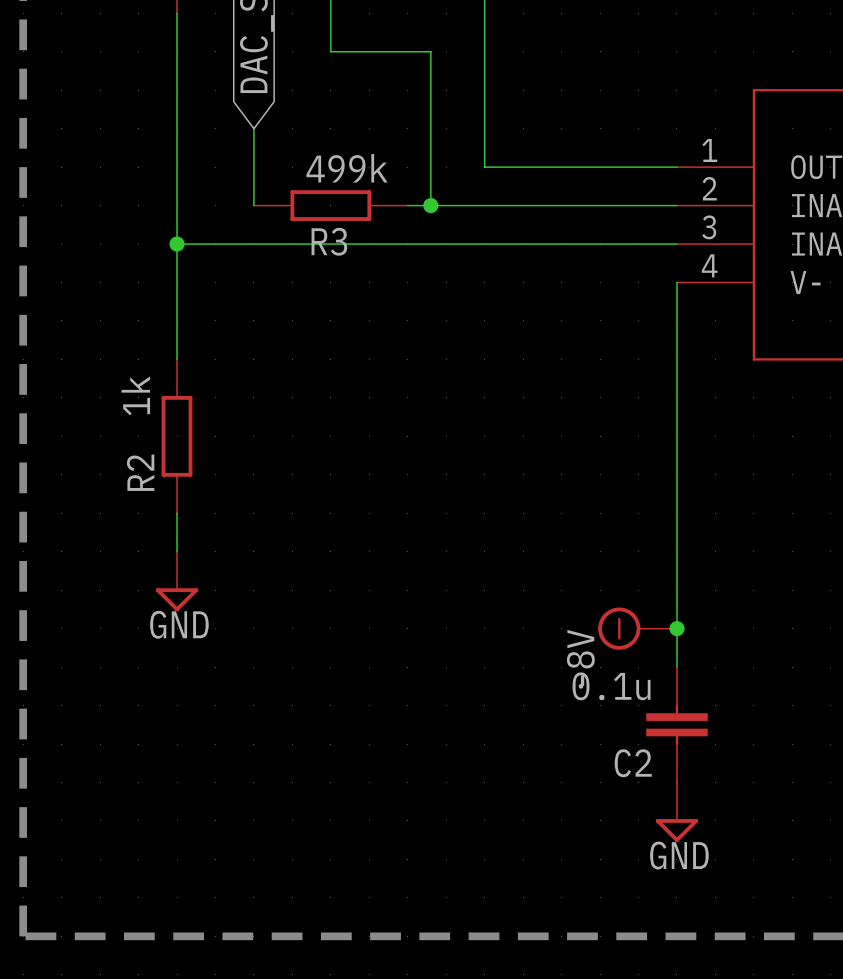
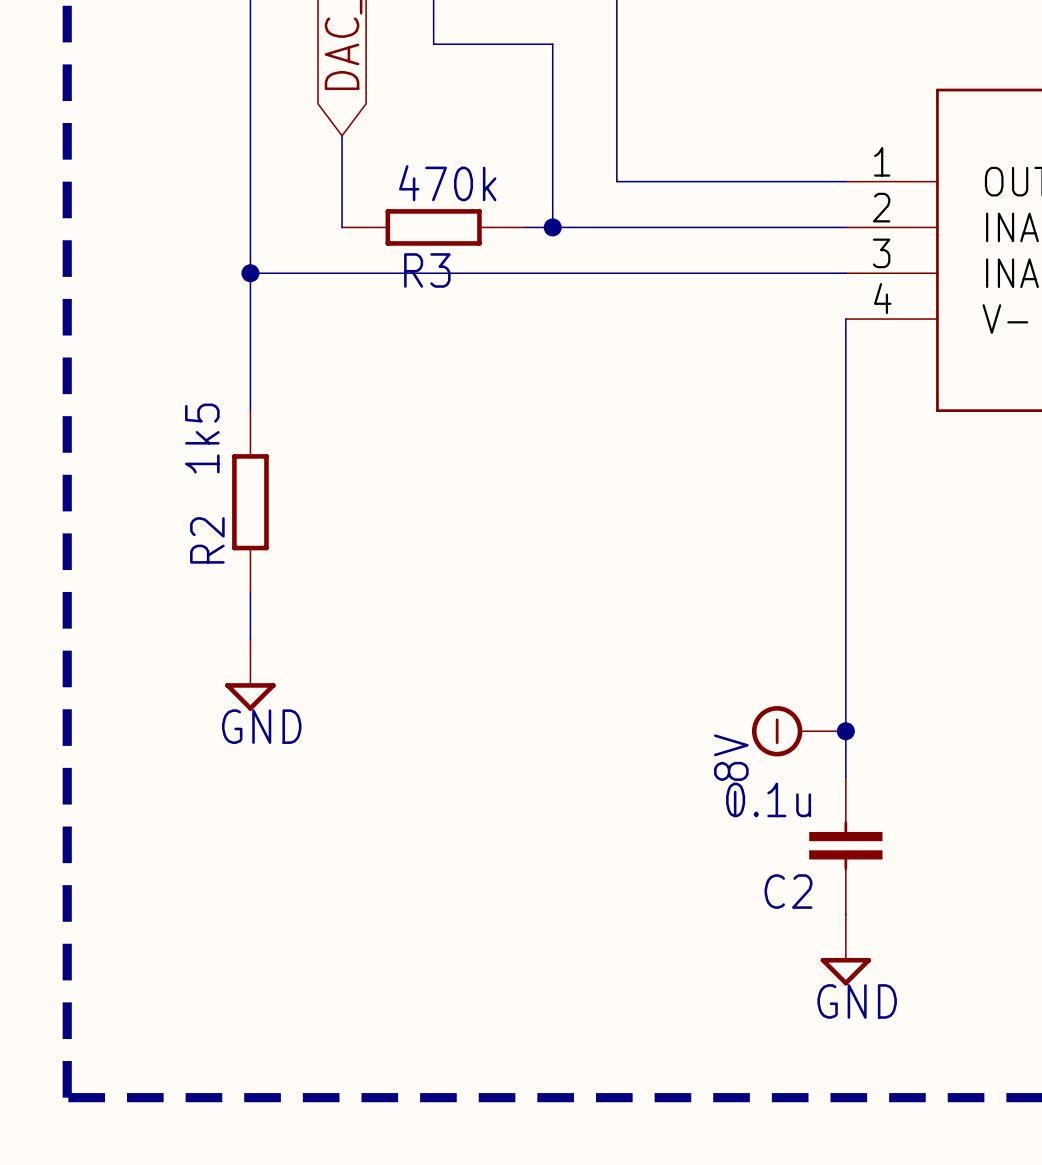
R3 value: 499k (347, 168) -> 470k (447, 183)
R2 value: 1k (135, 395) -> 1k5 (202, 438)

